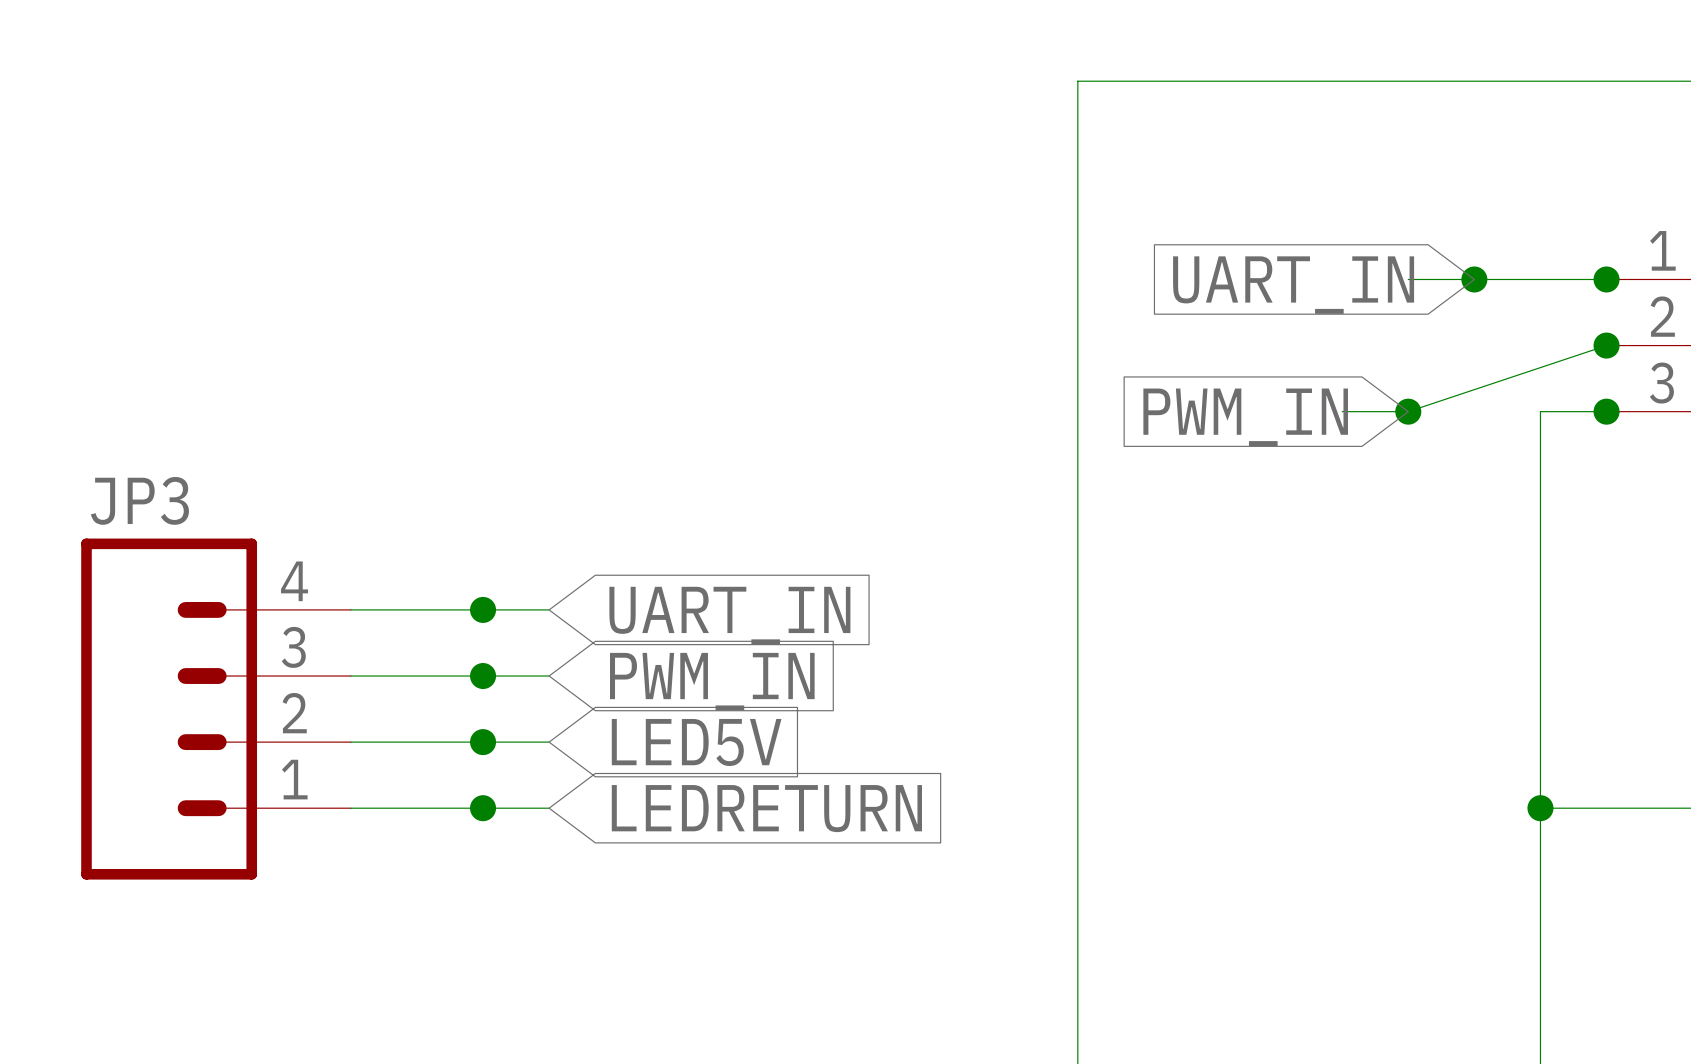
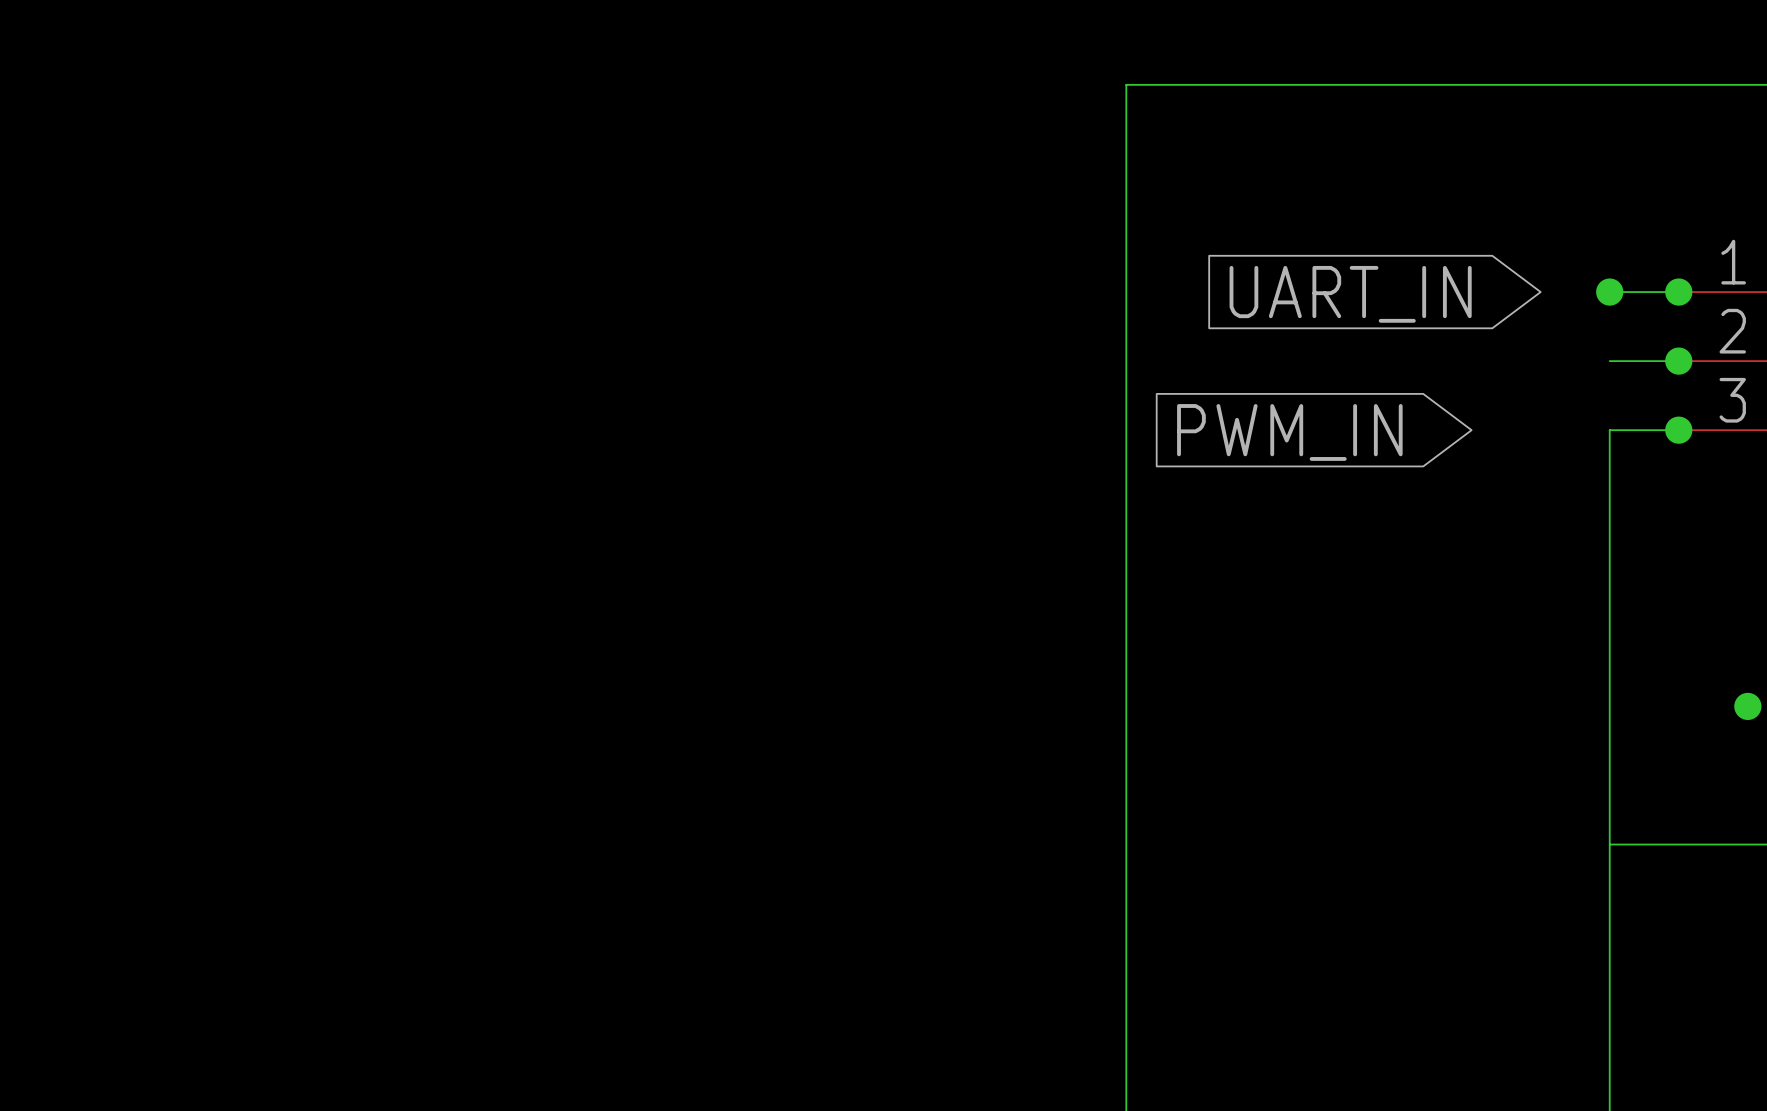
wire: (1408, 279) (1540, 279) -> none
junction position: (1474, 279) -> (1609, 292)
wire: (1606, 345) (1408, 411) (1342, 411) -> (1678, 361) (1609, 361)
junction: (1408, 411) -> none
wire: (350, 609) (549, 609) -> none
junction: (483, 609) -> none
global label: UART_IN (729, 615) -> none
wire: (350, 676) (549, 676) -> none
junction: (483, 676) -> none
junction: none -> (1747, 706)
global label: PWM_IN (712, 681) -> none
JP3: (216, 709) -> none
wire: (350, 742) (549, 742) -> none
junction: (483, 742) -> none
global label: LED5V (696, 742) -> none
wire: (350, 808) (549, 808) -> none
junction: (483, 808) -> none
global label: LEDRETURN (766, 808) -> none
junction: (1540, 808) -> none

